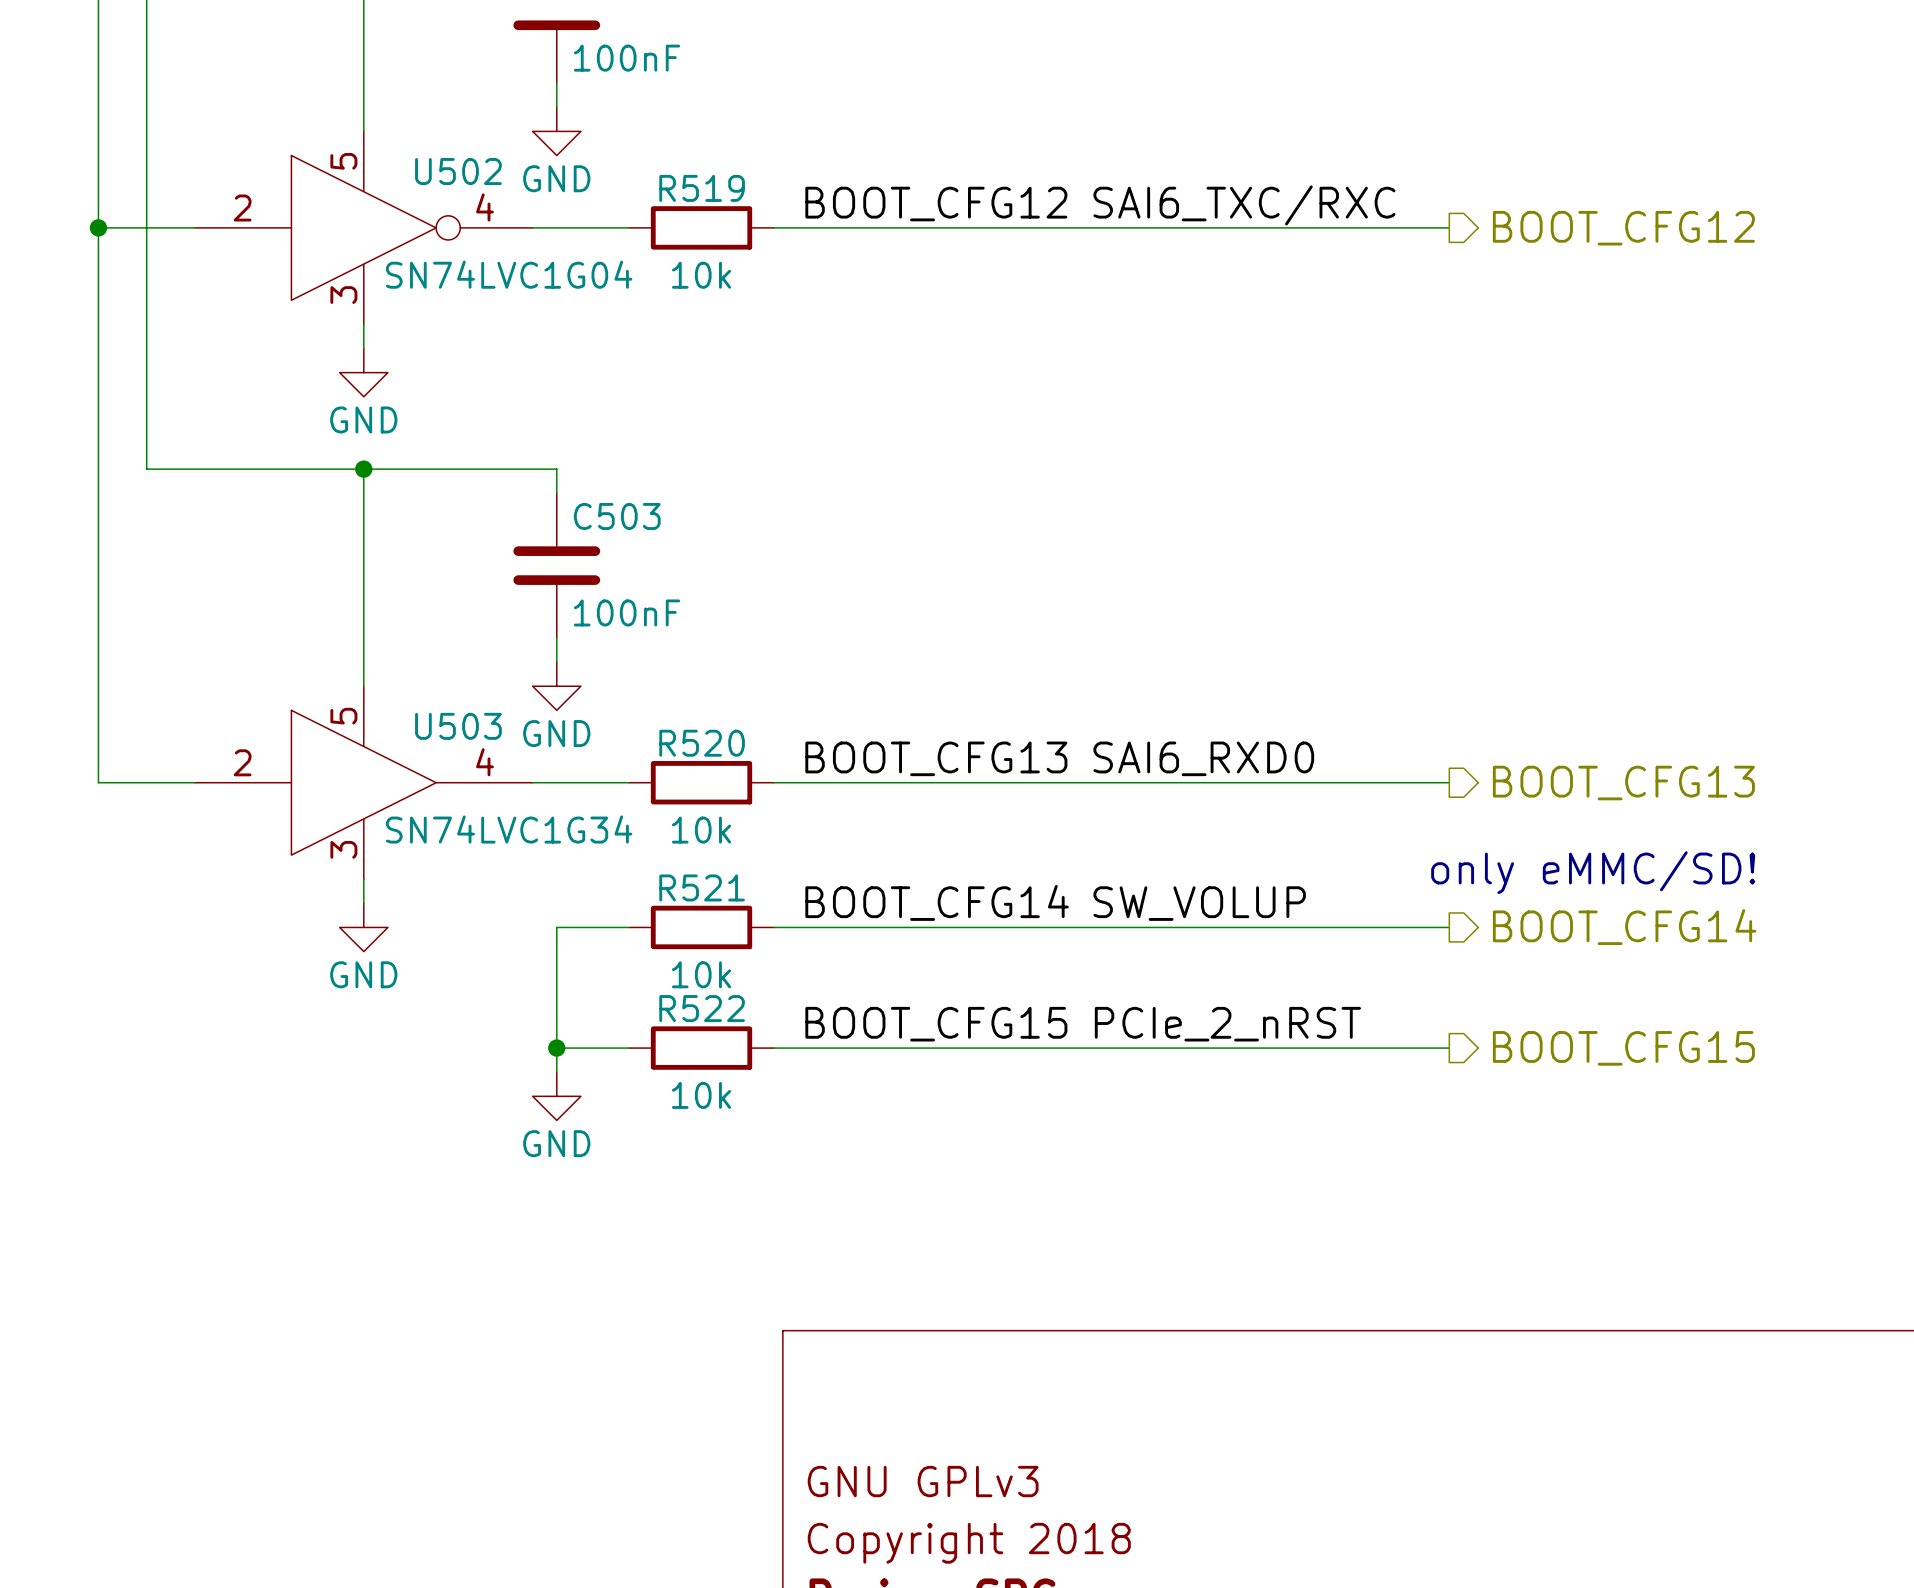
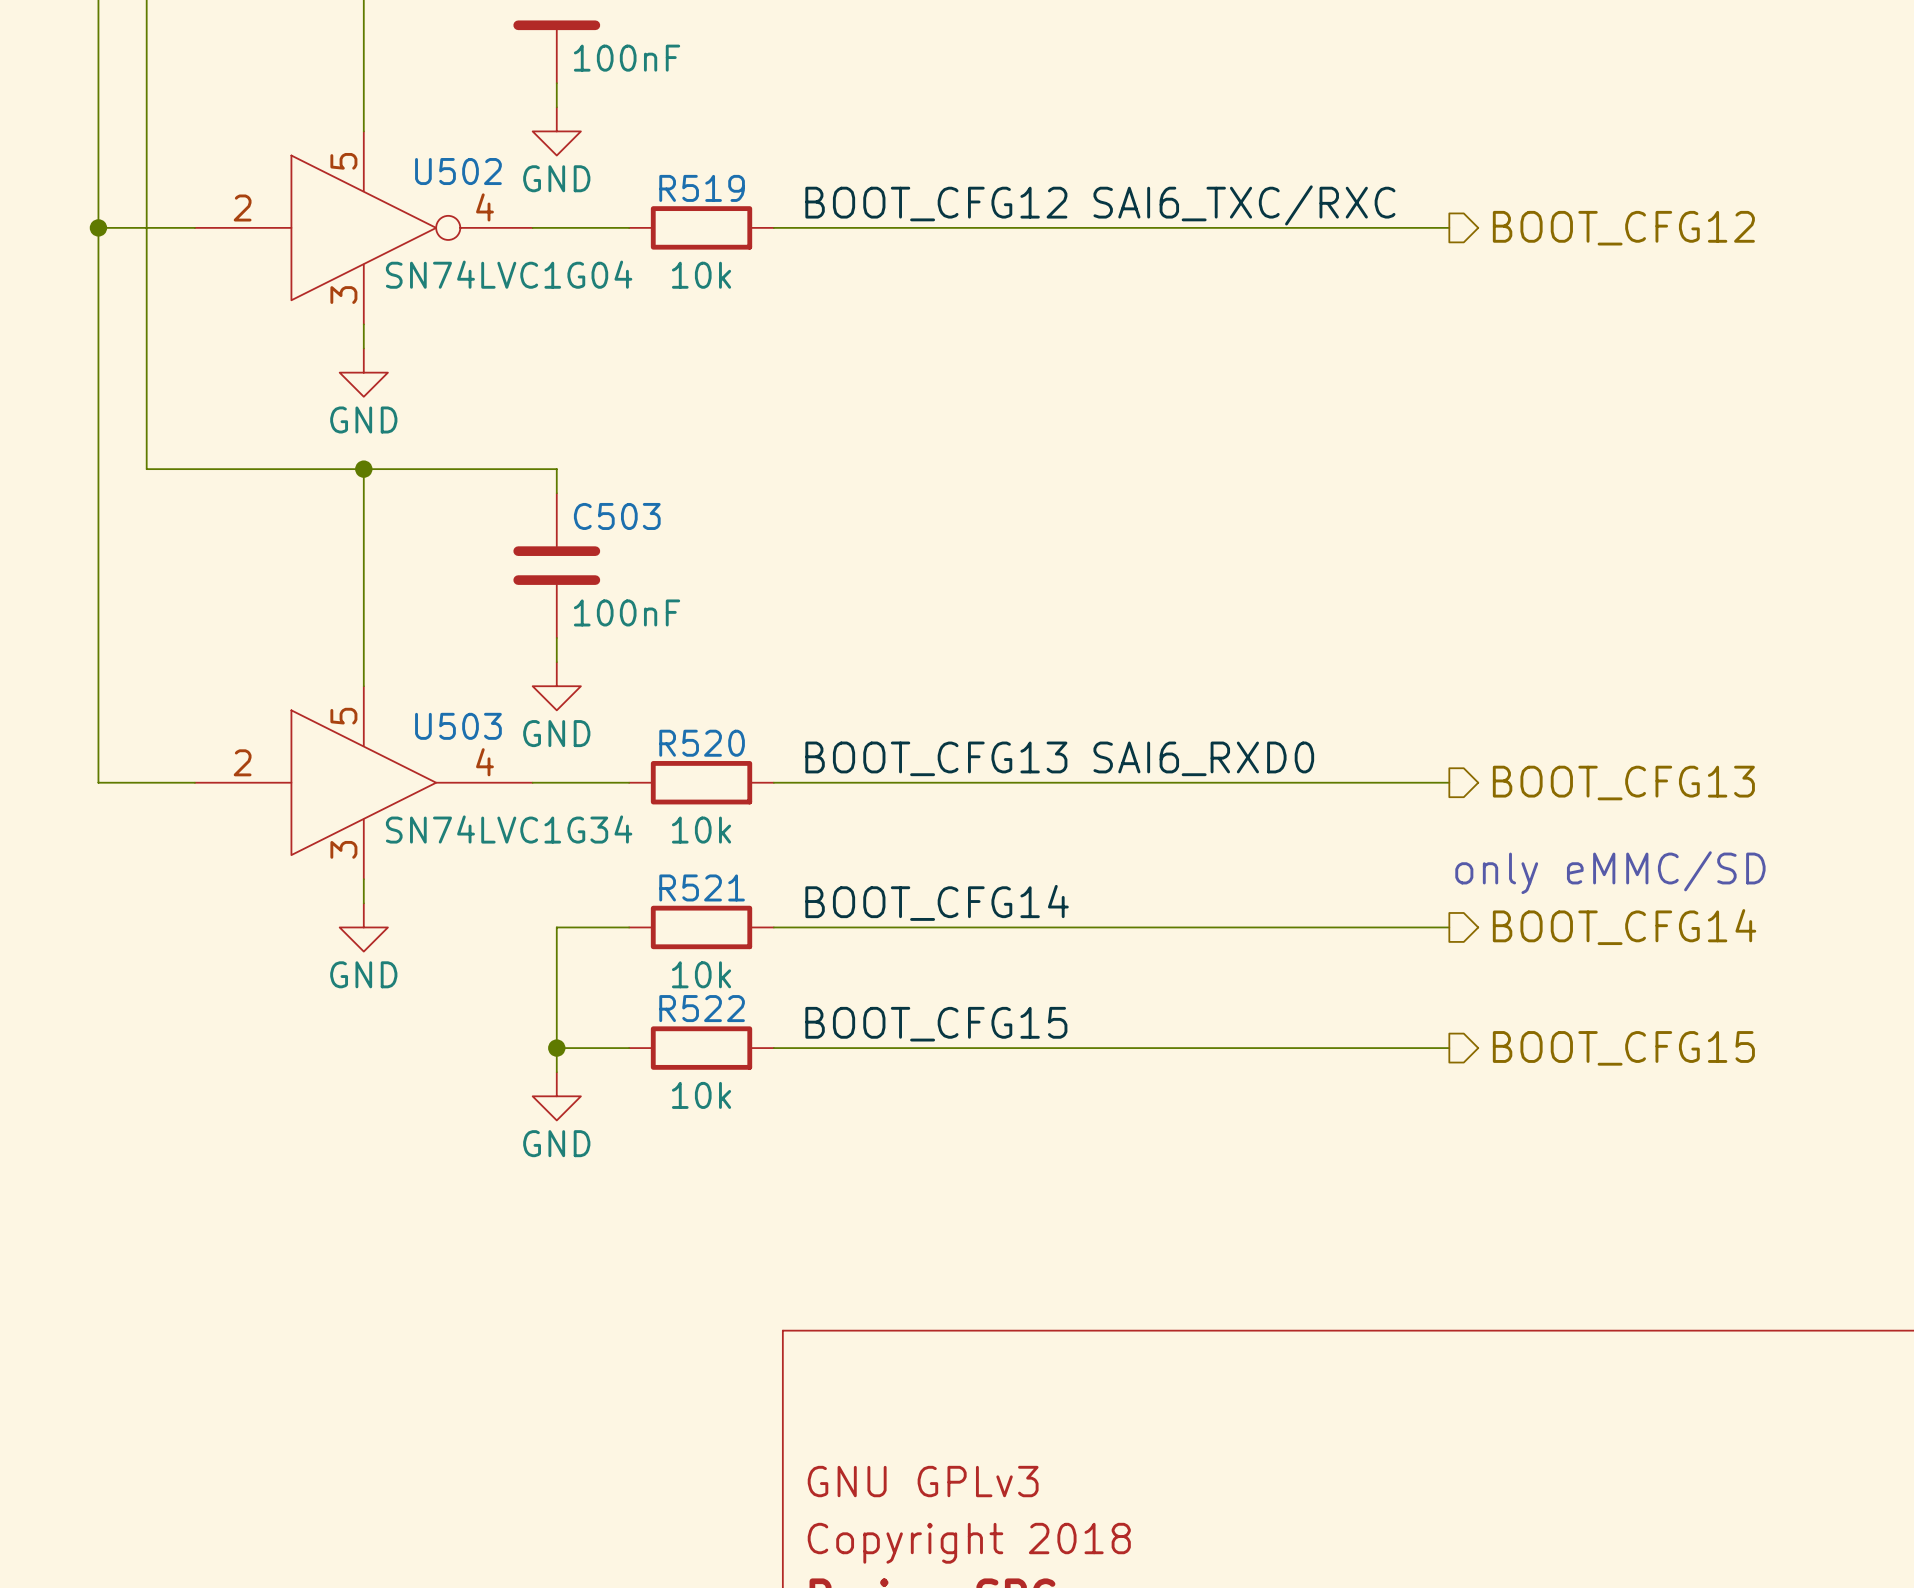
text: only eMMC/SD! (1593, 872) -> only eMMC/SD (1610, 872)
label: SW_VOLUP (1199, 903) -> none
label: PCIe_2_nRST (1227, 1024) -> none

